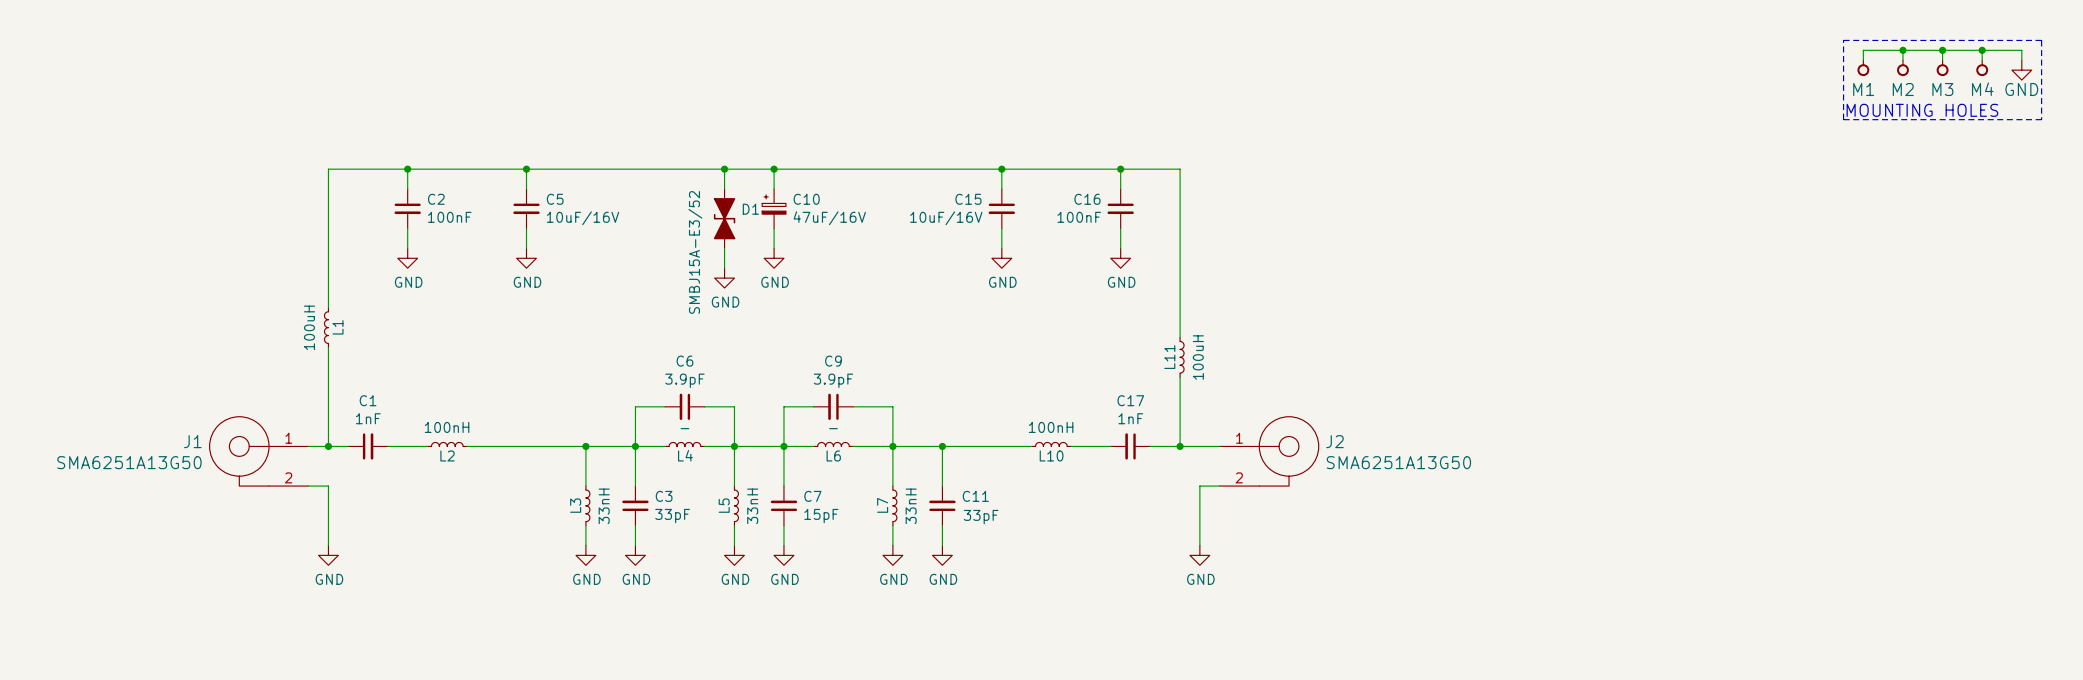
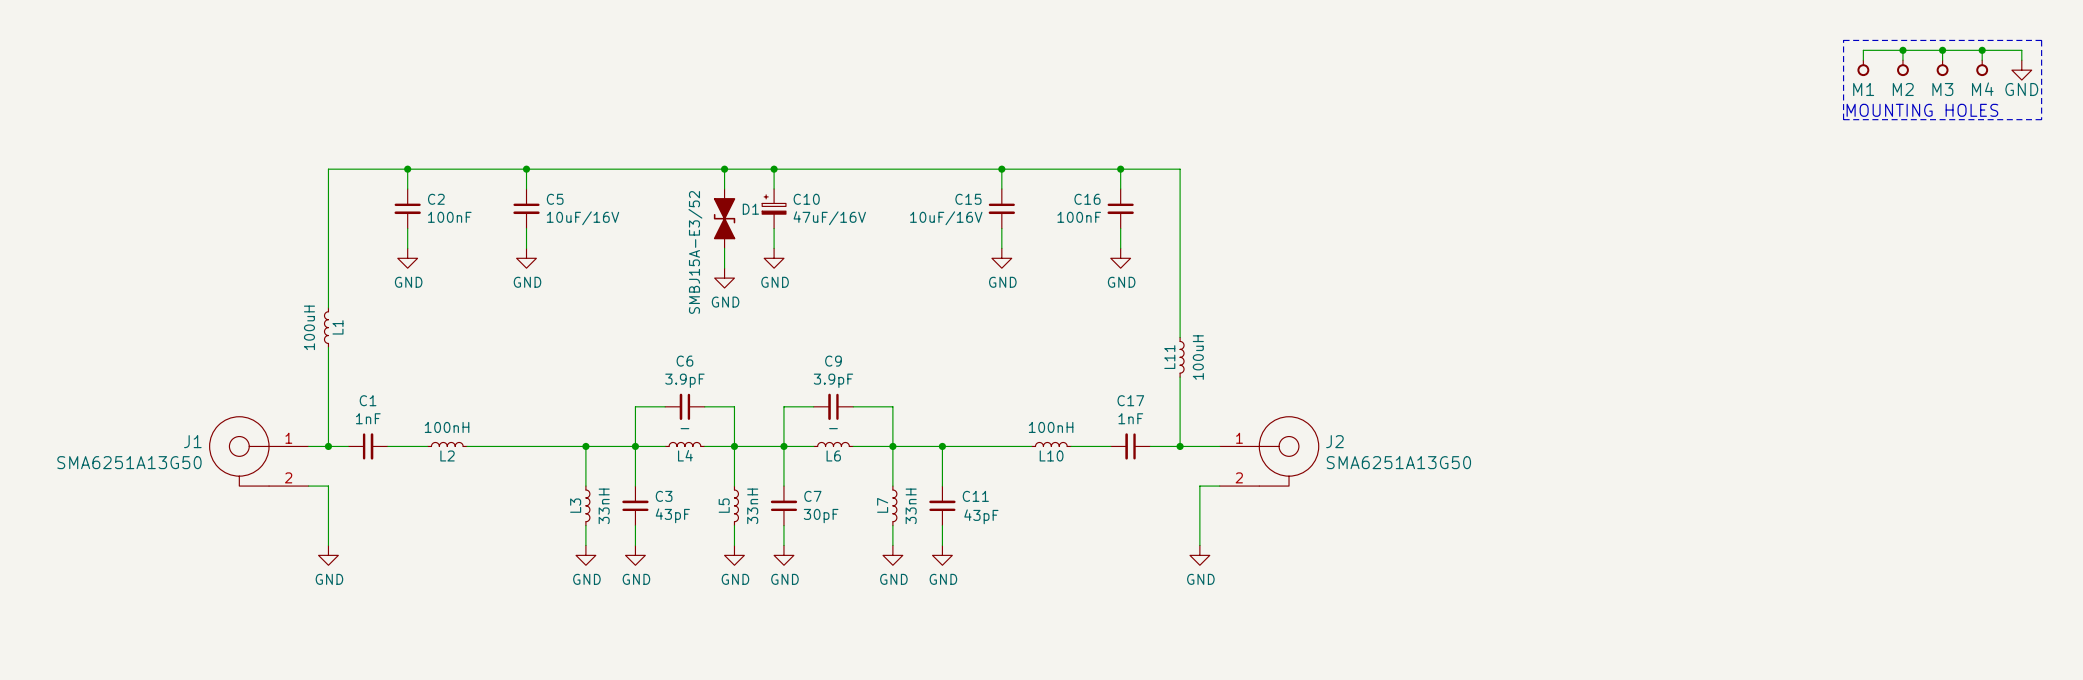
C3 value: 33pF (672, 516) -> 43pF (672, 515)
C7 value: 15pF (821, 516) -> 30pF (821, 516)
C11 value: 33pF (981, 517) -> 43pF (981, 516)

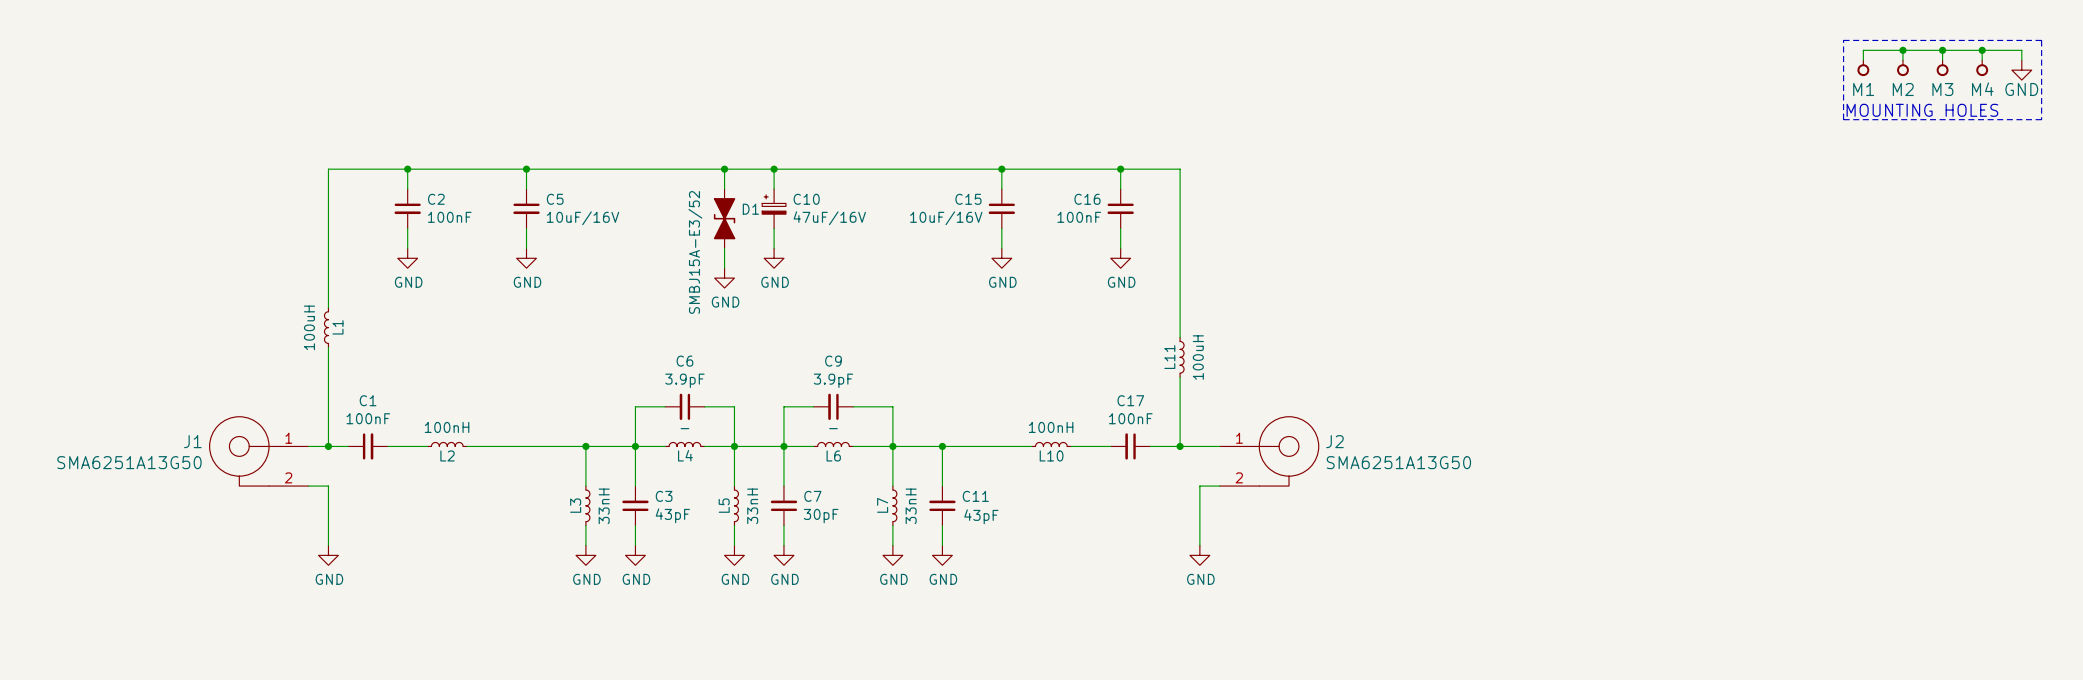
C1 value: 1nF (368, 418) -> 100nF (368, 418)
C17 value: 1nF (1130, 418) -> 100nF (1130, 418)

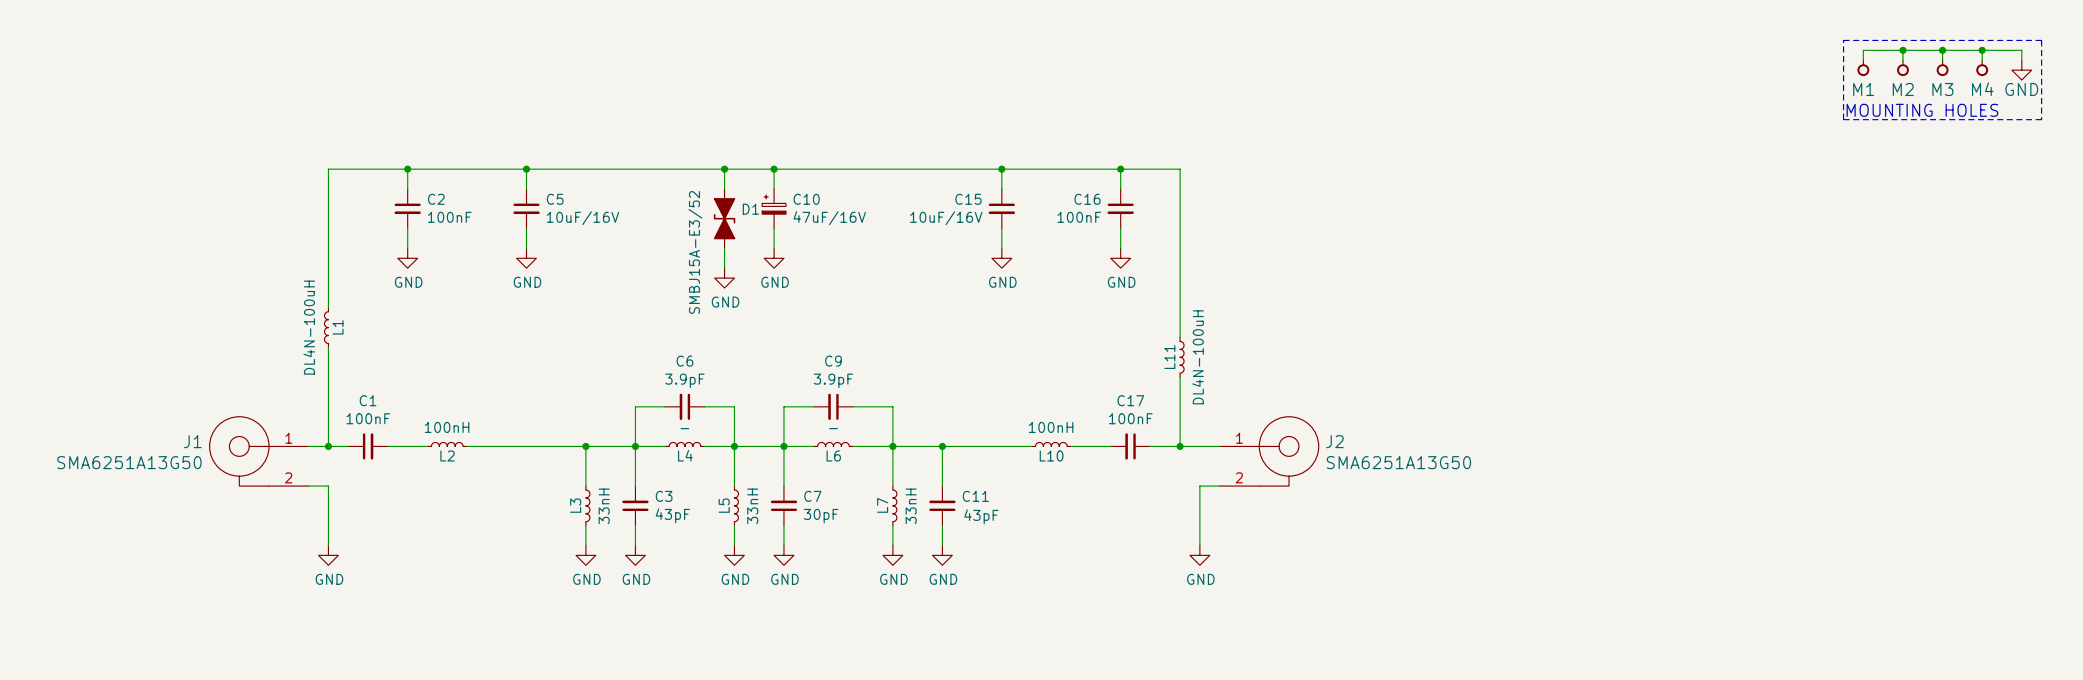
L1 value: 100uH (309, 327) -> DL4N-100uH (309, 327)
L11 value: 100uH (1198, 357) -> DL4N-100uH (1198, 357)

